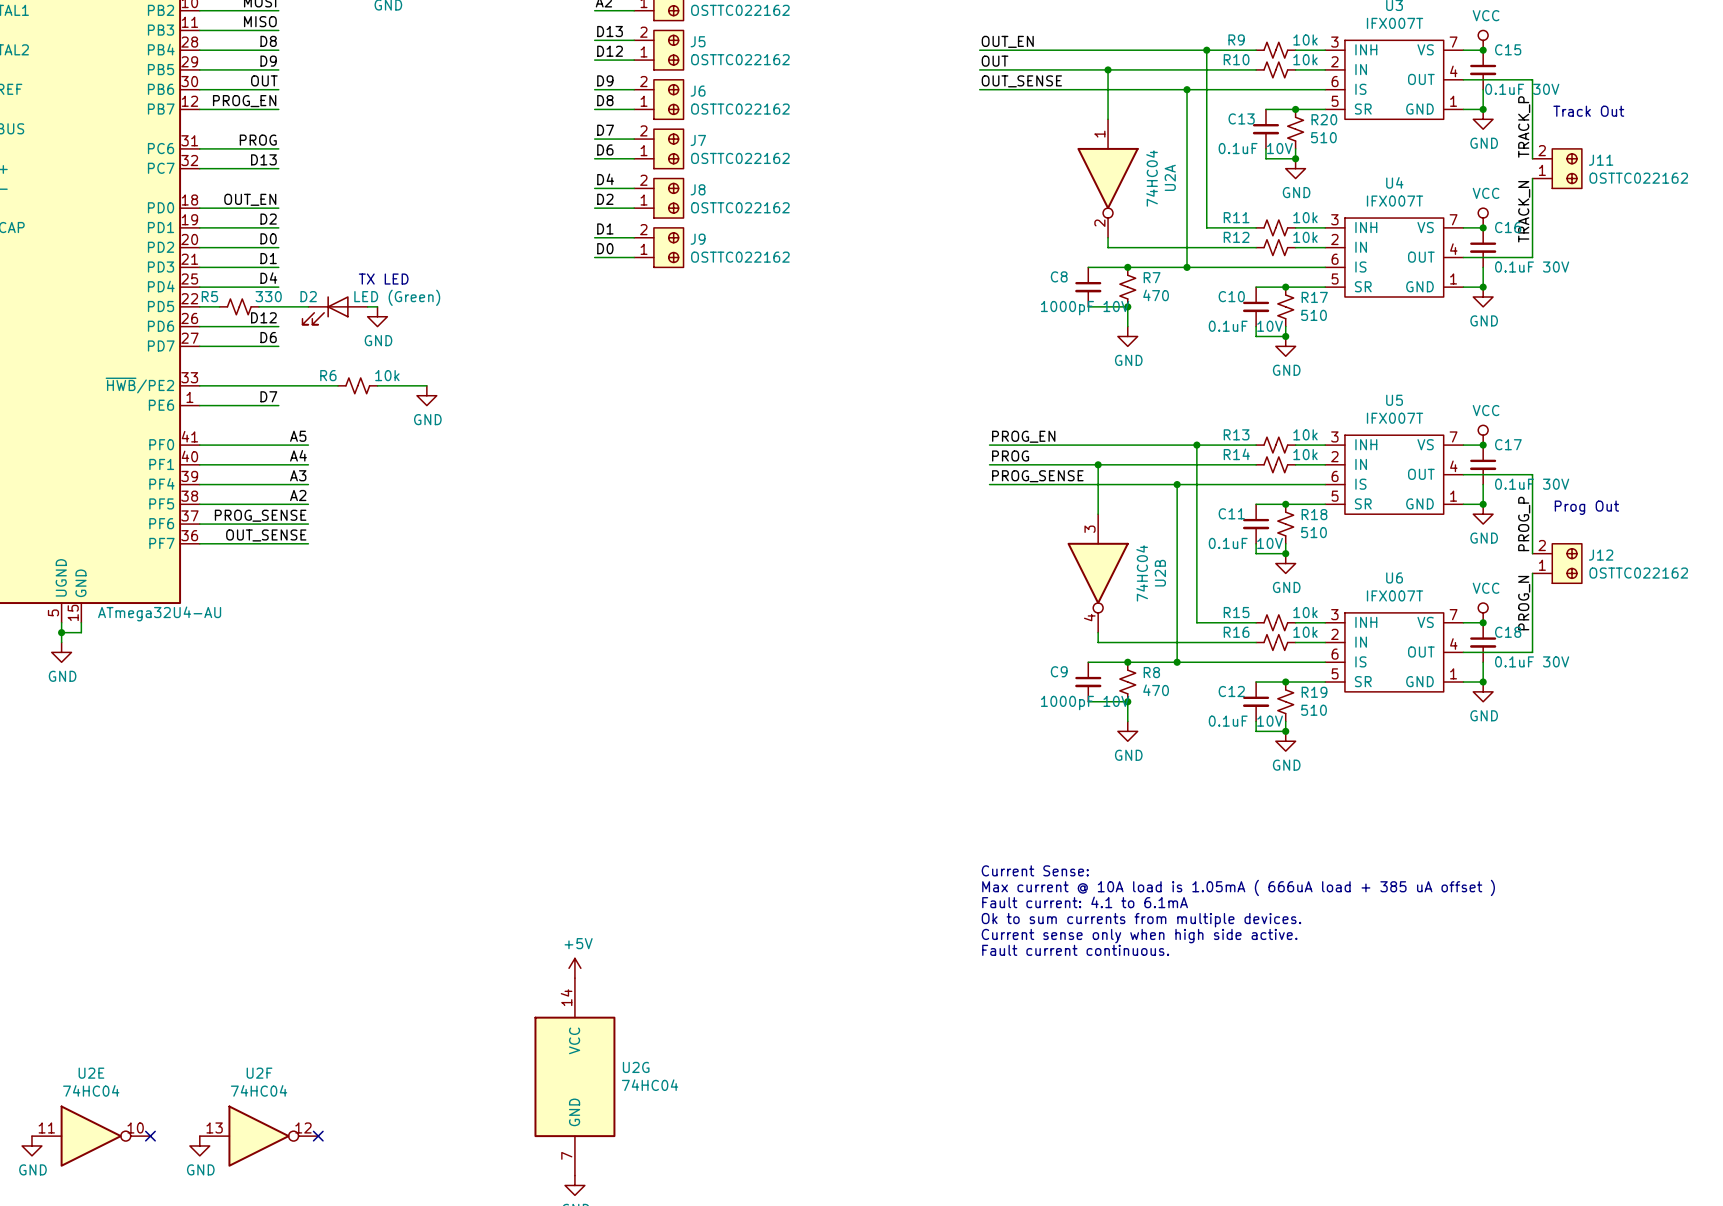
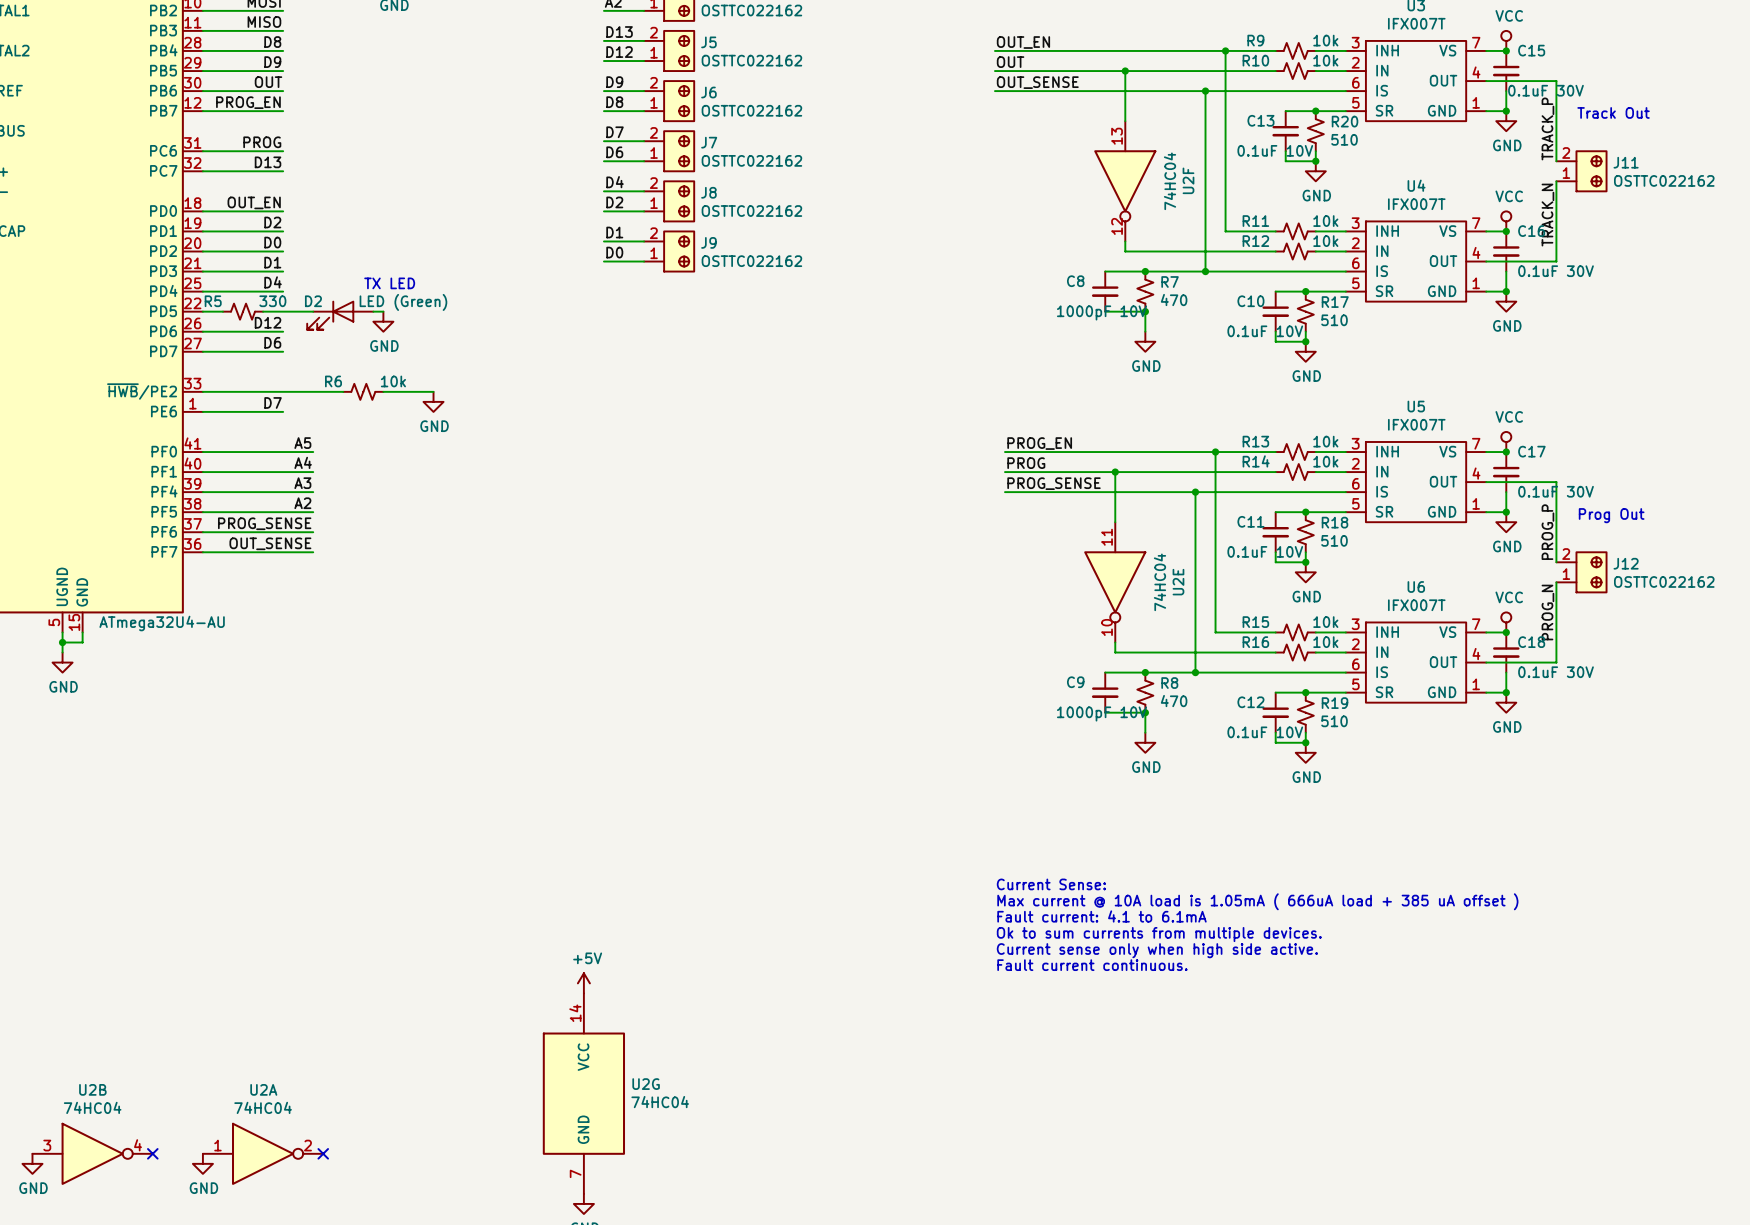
U2A rotation: 0° (1108, 178) -> 90° counterclockwise (263, 1153)
U2A position: (1108, 178) -> (263, 1153)
U2B rotation: 0° (1098, 573) -> 90° counterclockwise (92, 1153)
U2B position: (1098, 573) -> (92, 1153)
U2E rotation: 0° (91, 1136) -> 90° clockwise (1115, 582)
U2E position: (91, 1136) -> (1115, 582)
U2F rotation: 0° (259, 1136) -> 90° clockwise (1125, 181)
U2F position: (259, 1136) -> (1125, 181)

